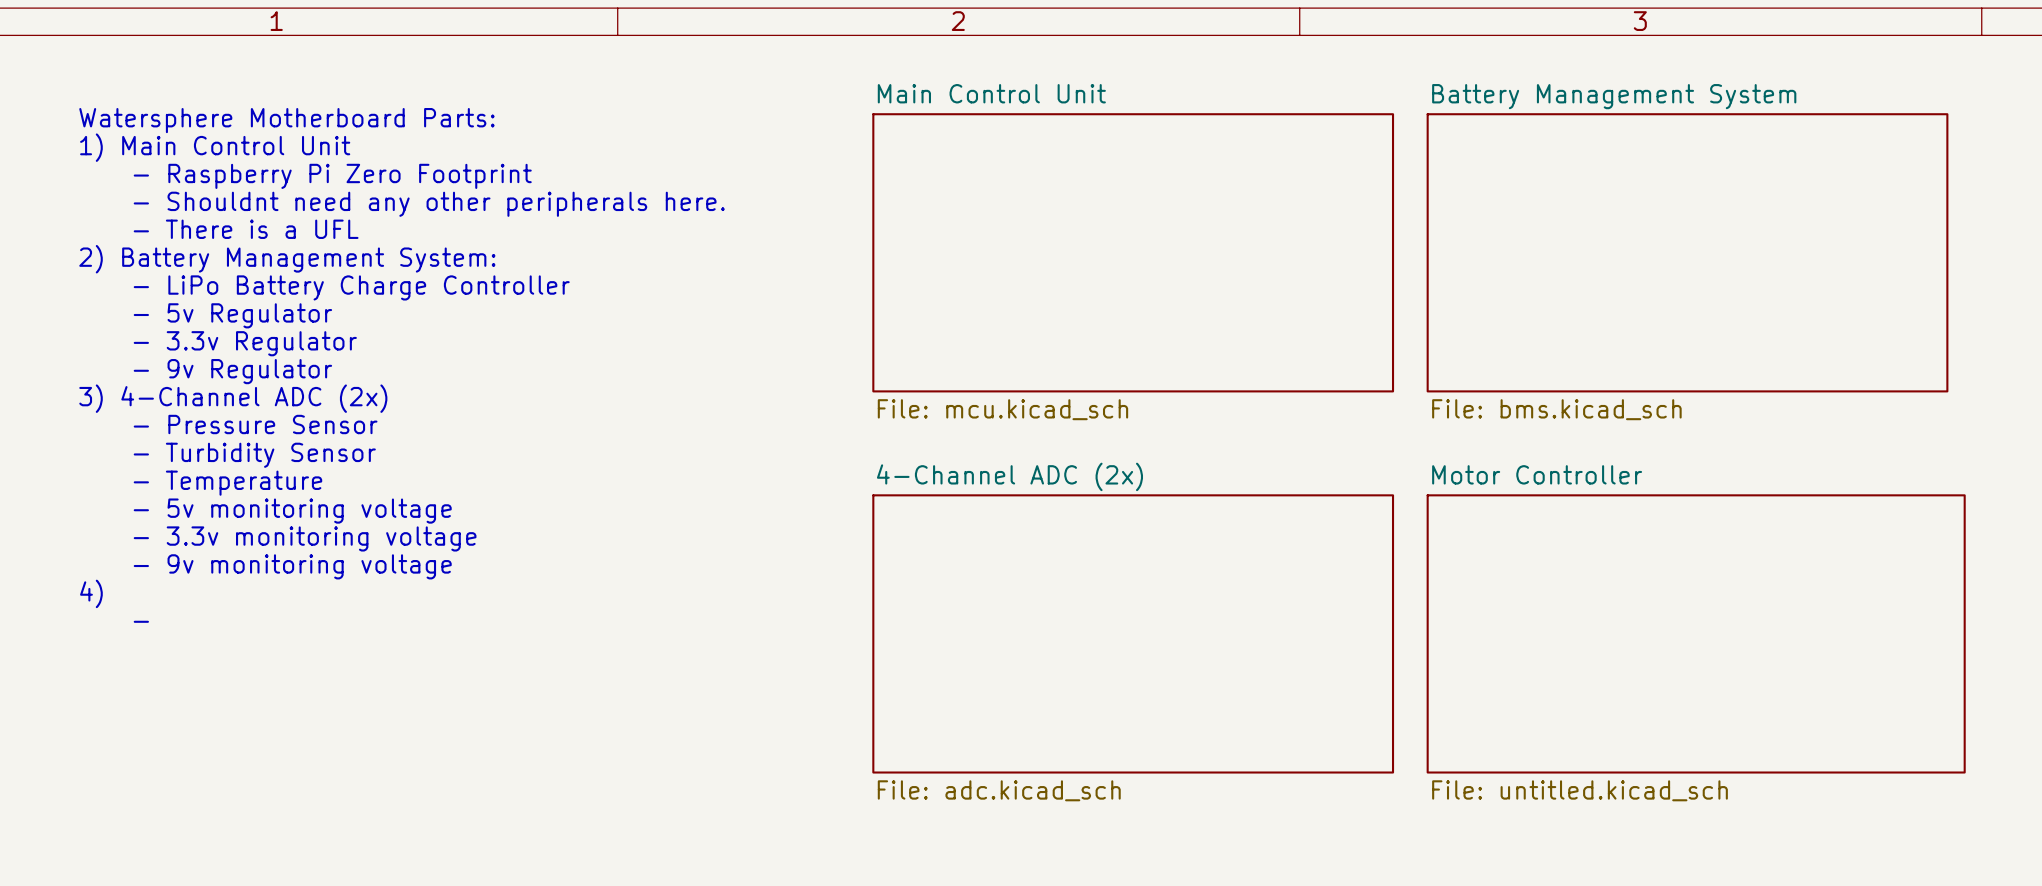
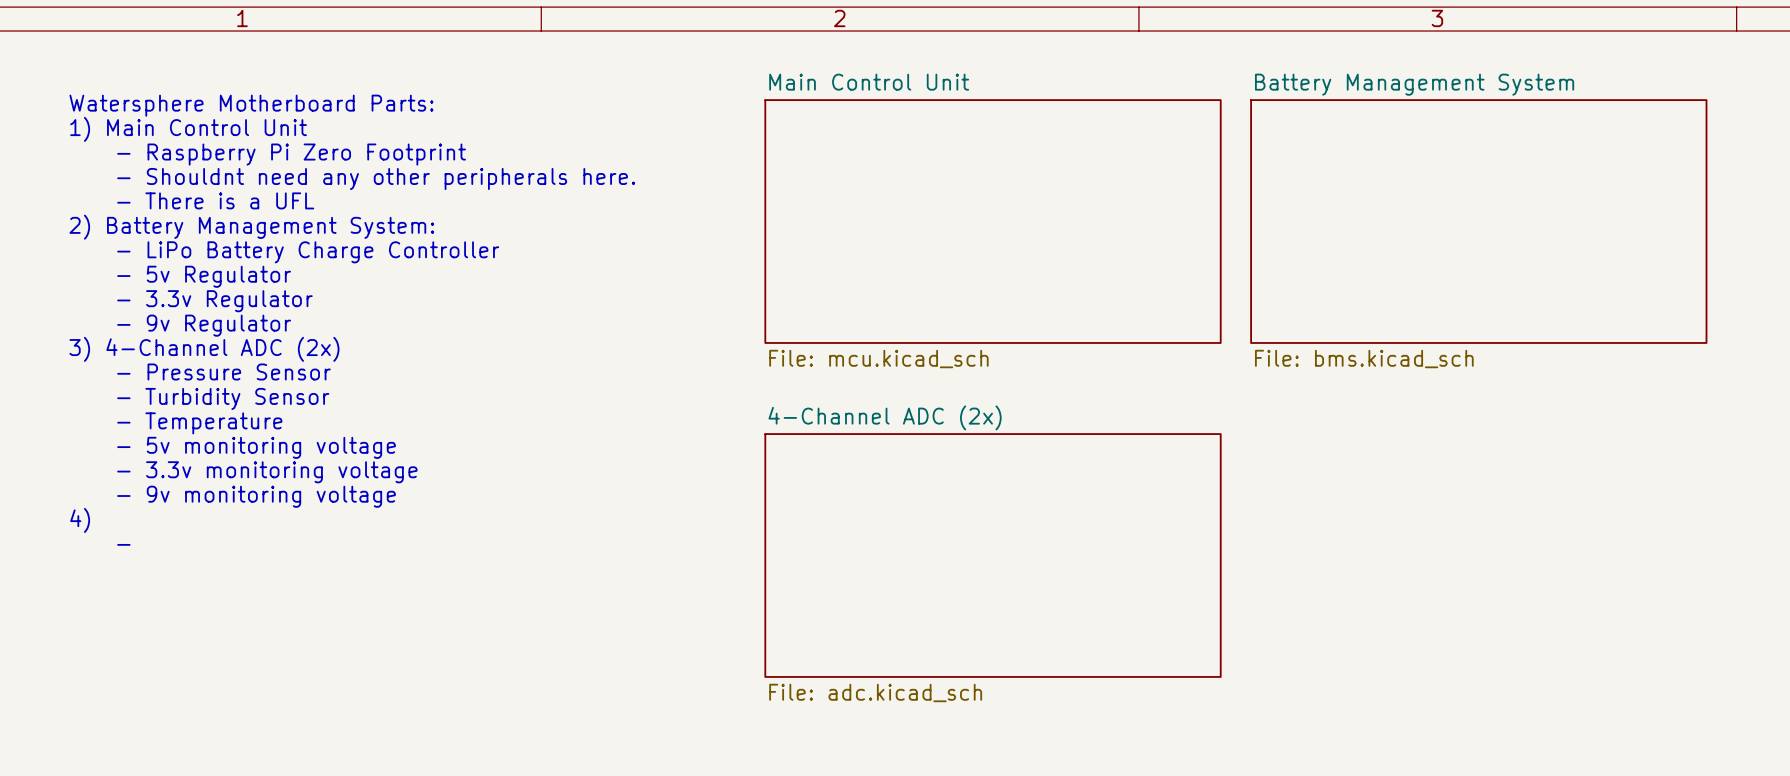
sheet Motor Controller: File: untitled.kicad_sch (1696, 633) -> none

